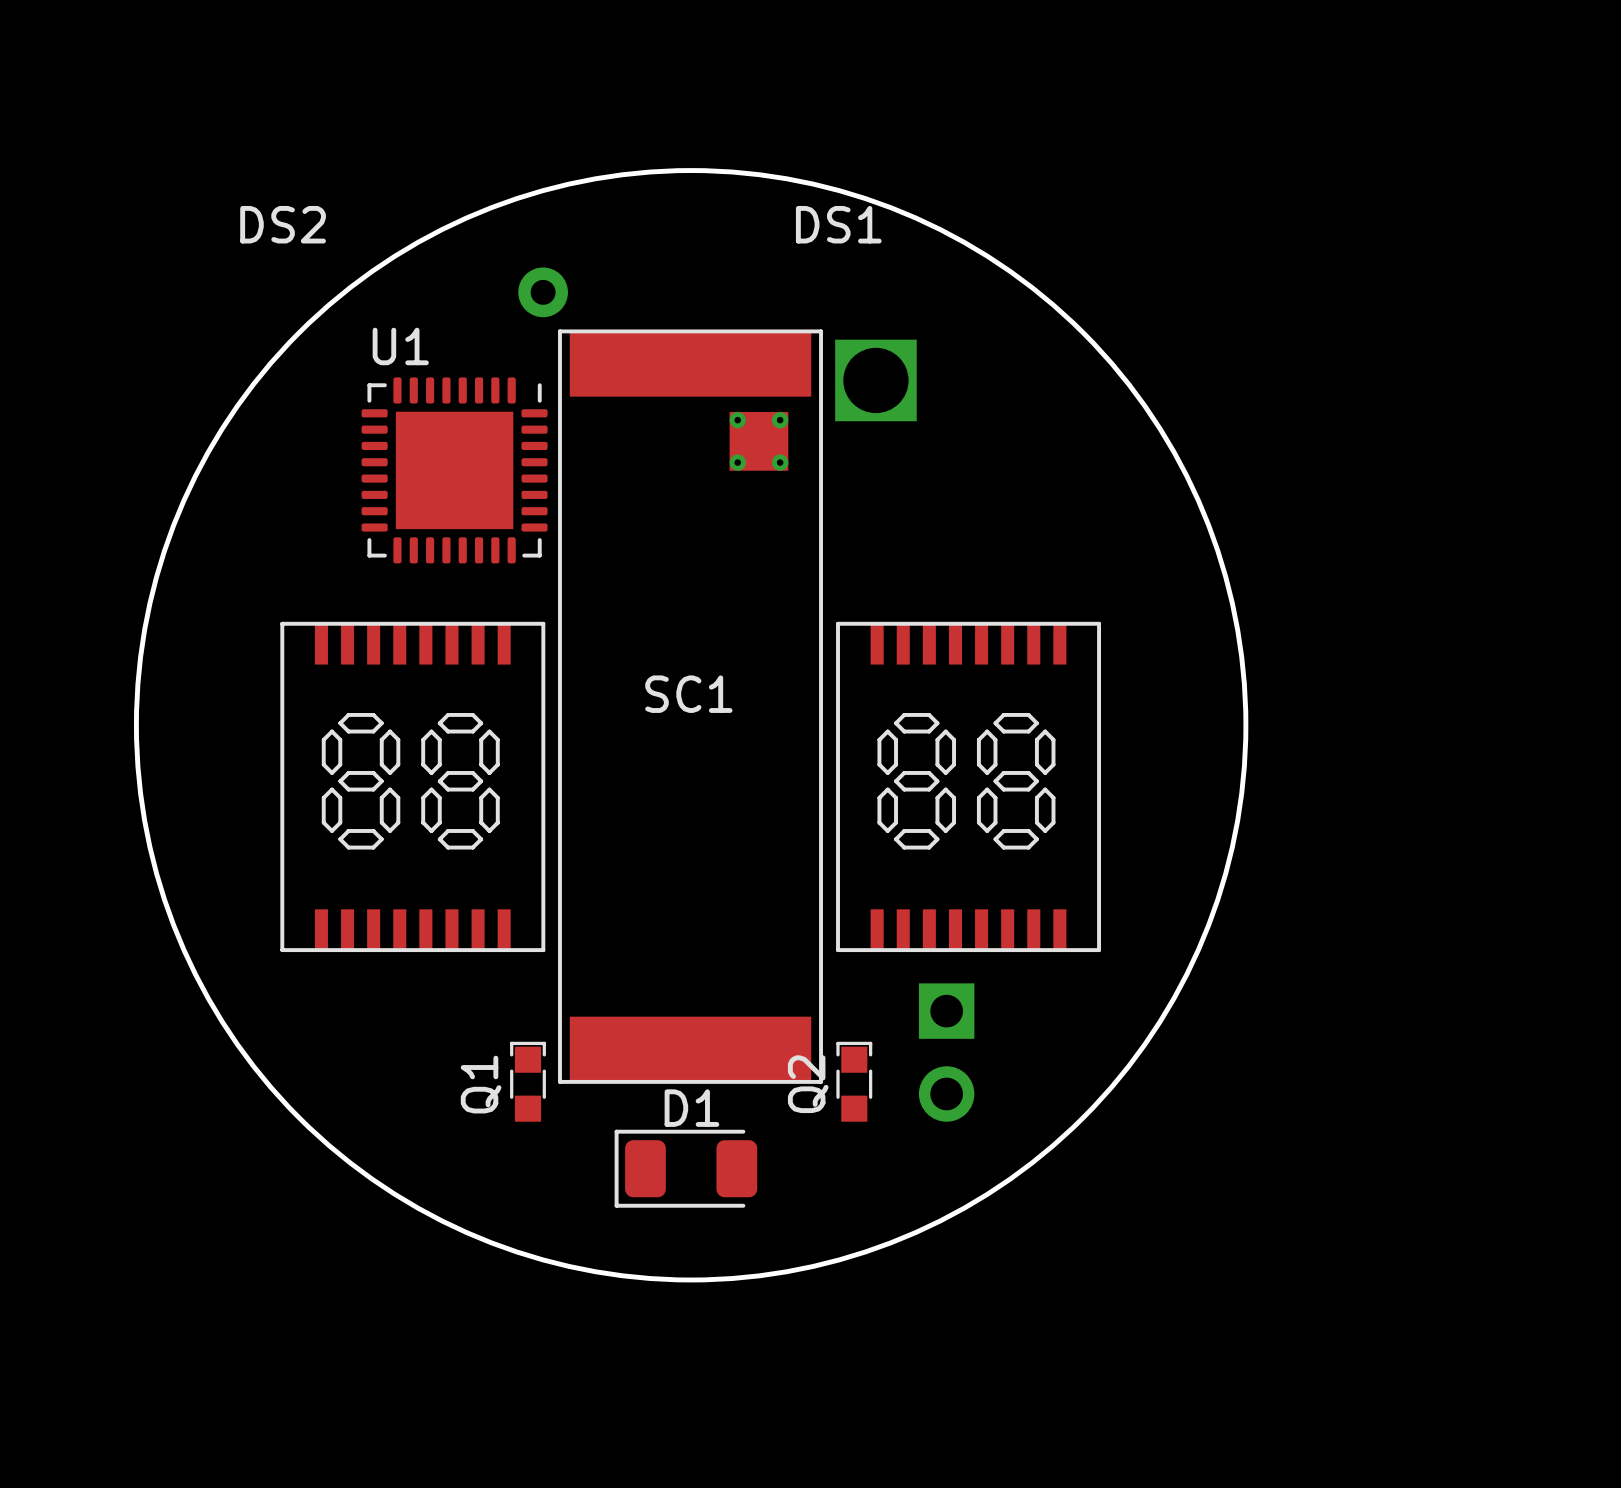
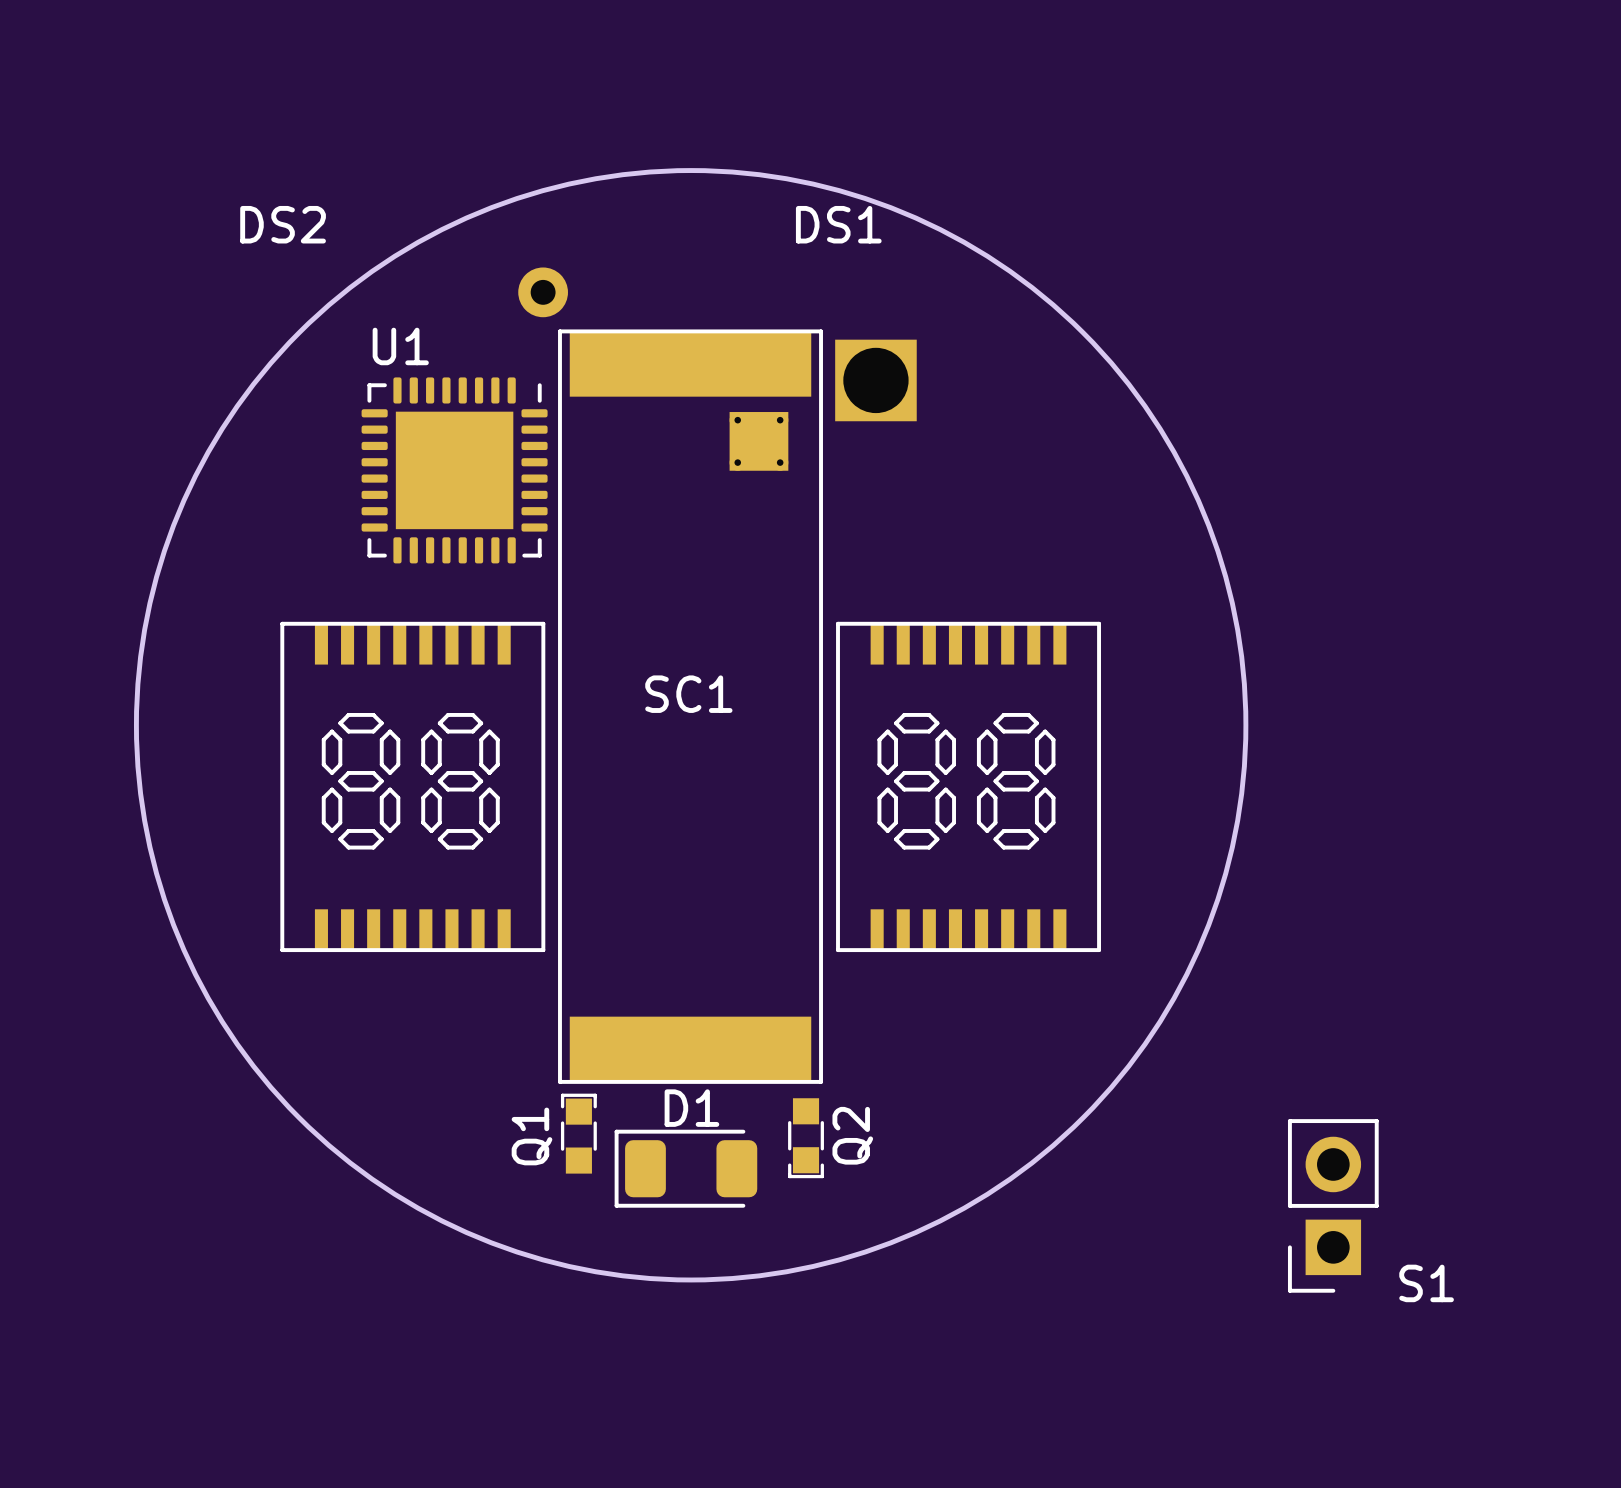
S1 side: bottom (946, 1052) -> top (1333, 1205)
Q1 position: (528, 1081) -> (578, 1133)
Q2 rotation: 0° (854, 1081) -> 180° (806, 1138)
Q2 position: (854, 1081) -> (806, 1138)

